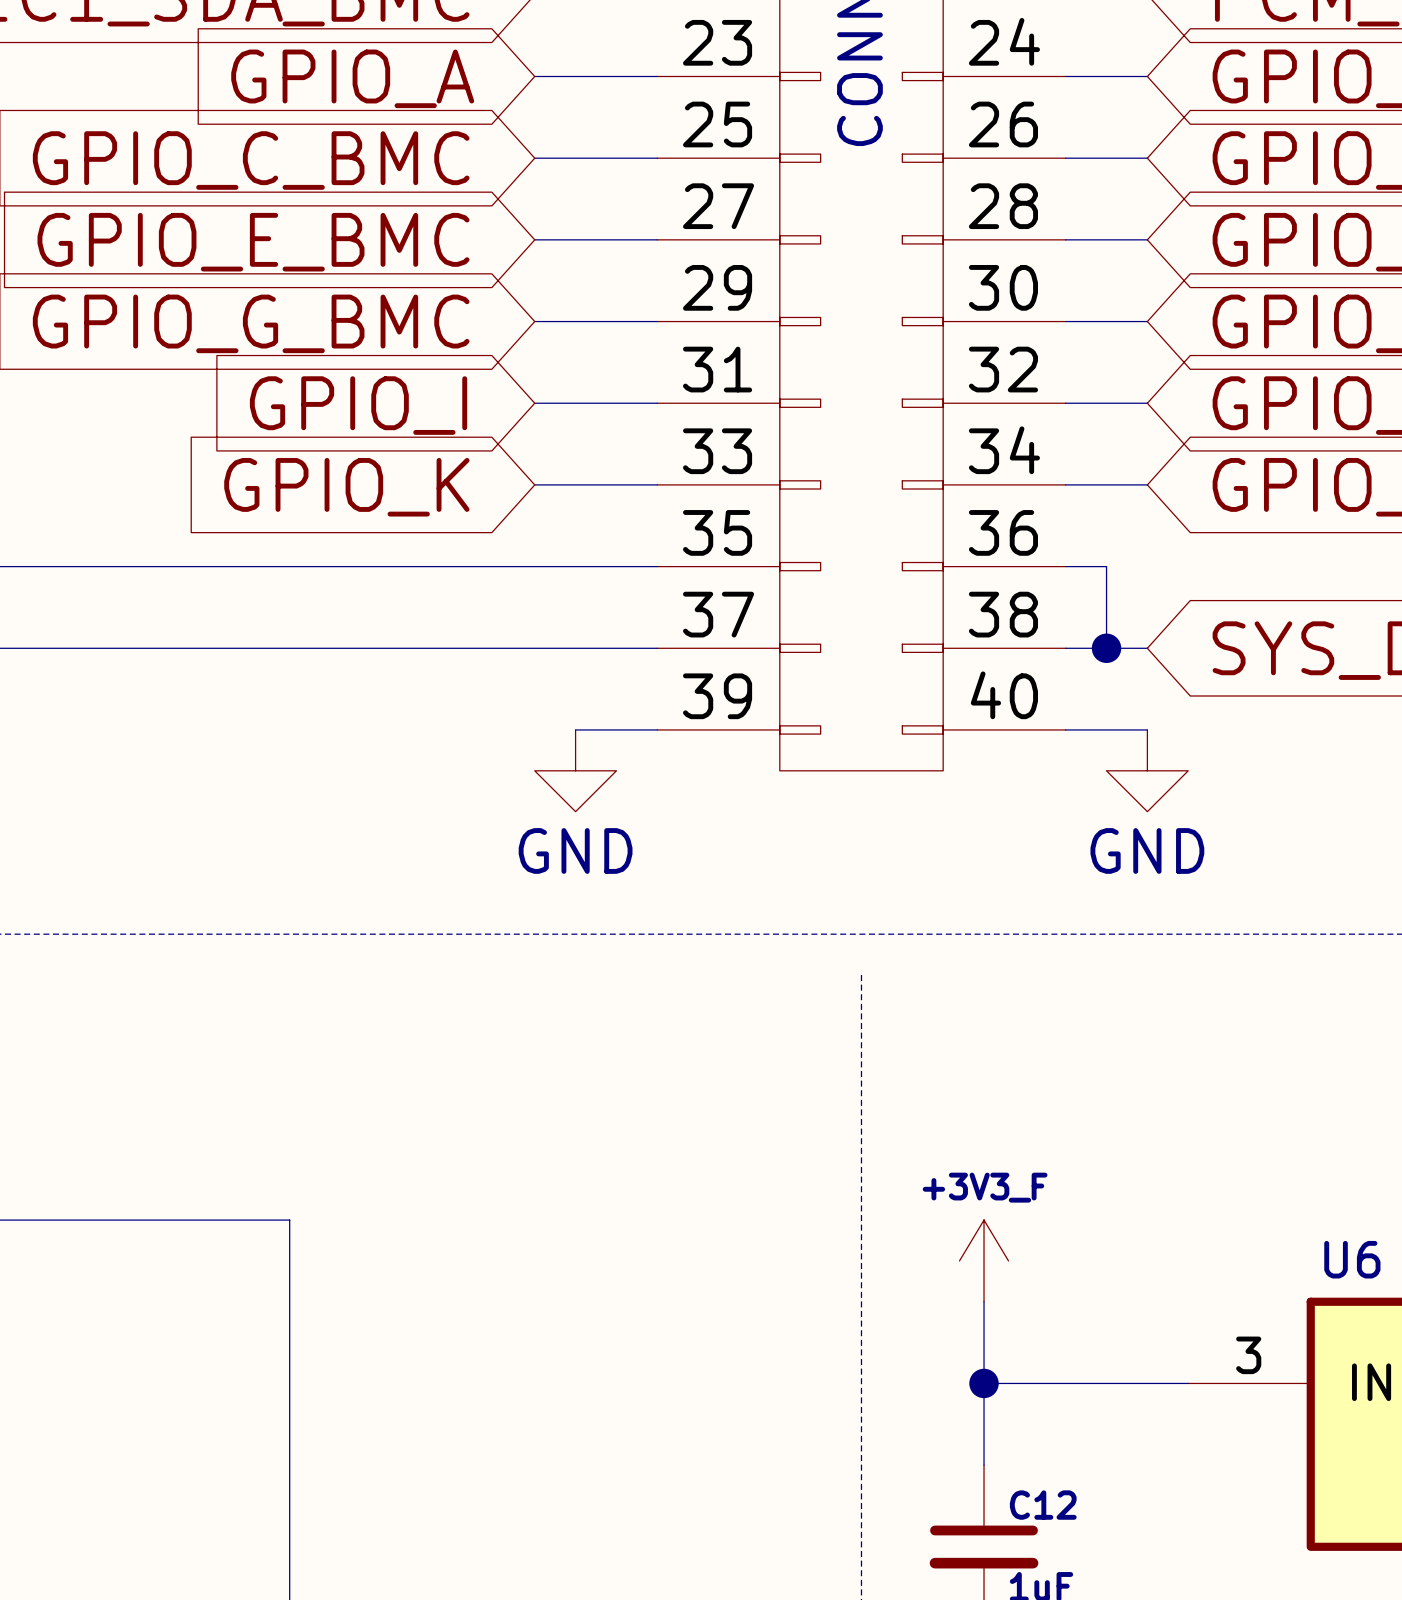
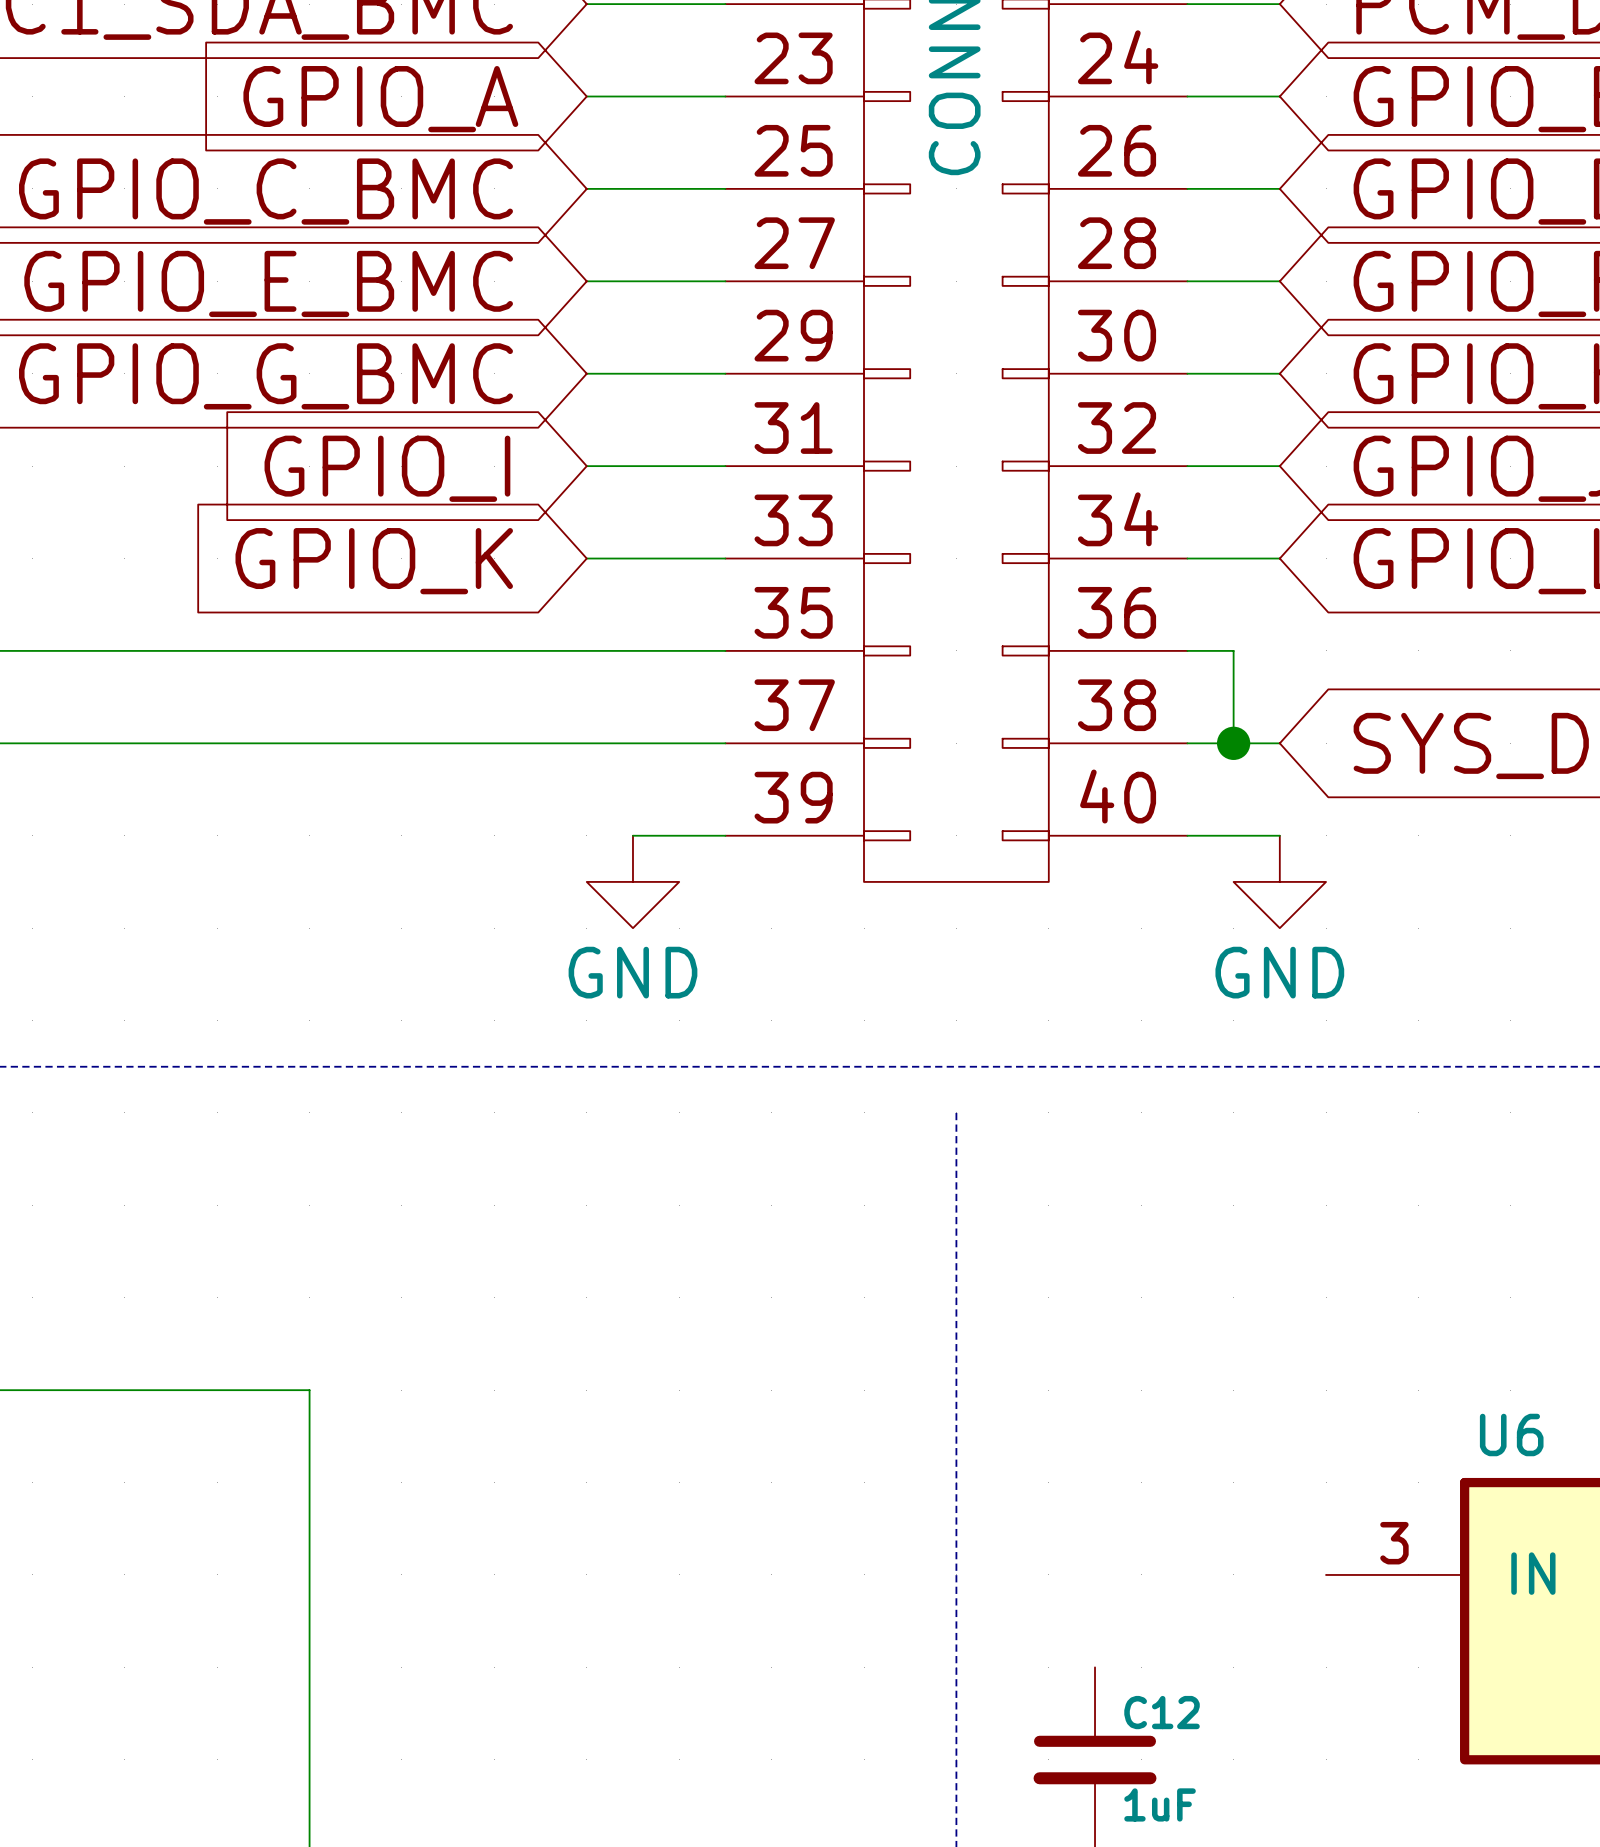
power symbol: +3V3_F (984, 1260) -> none
wire: (984, 1301) (984, 1465) -> none
wire: (984, 1383) (1188, 1383) -> none
junction: (984, 1383) -> none

